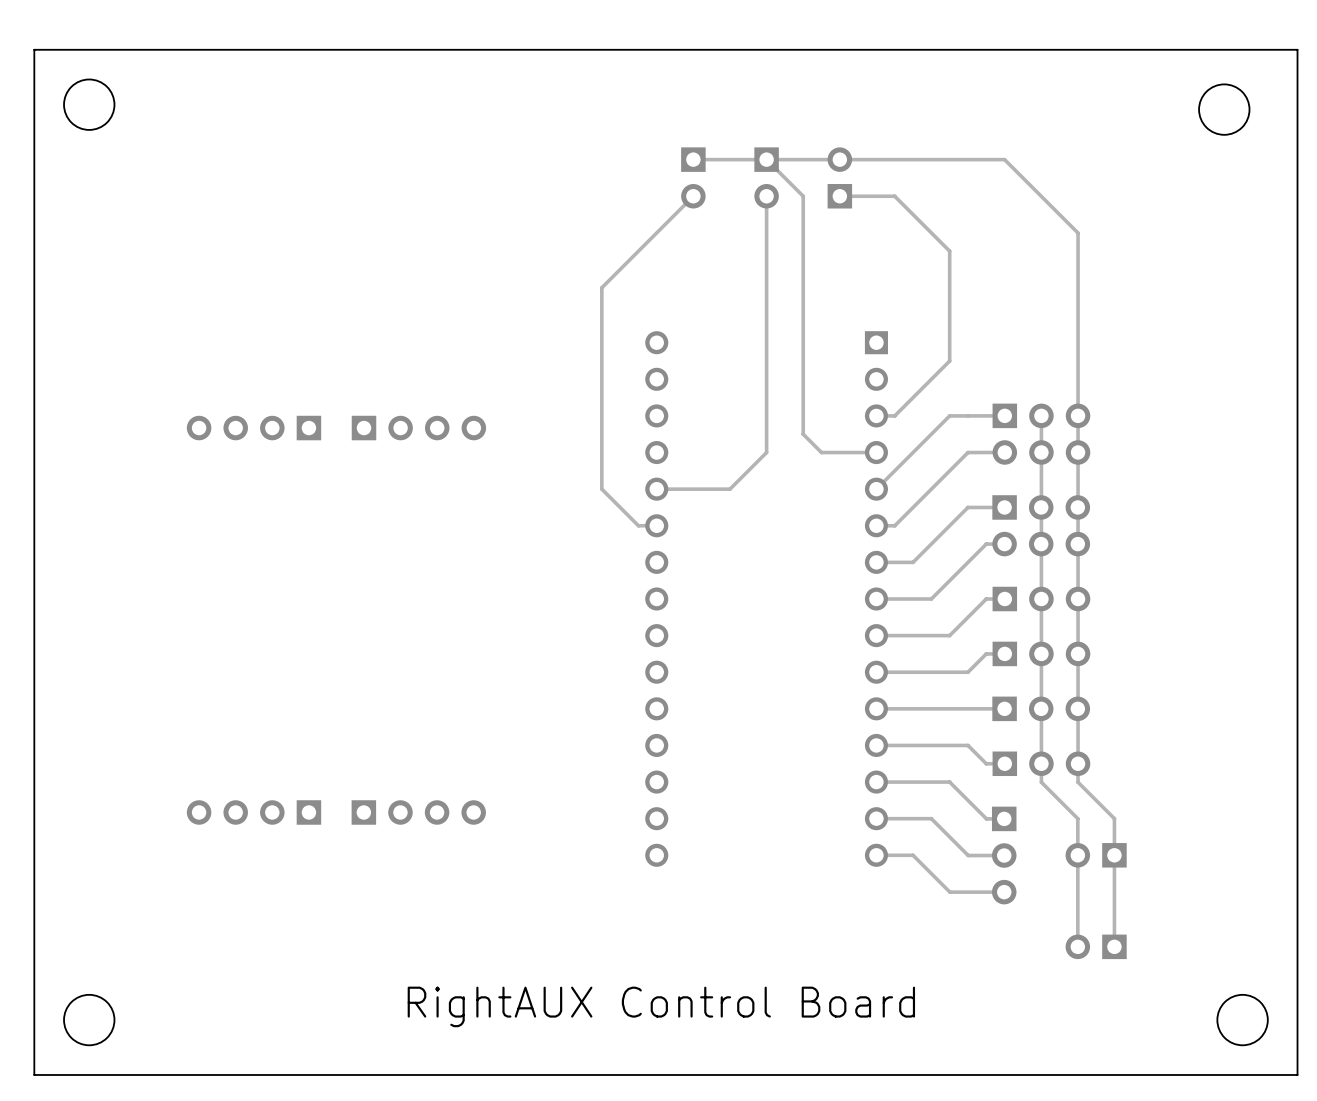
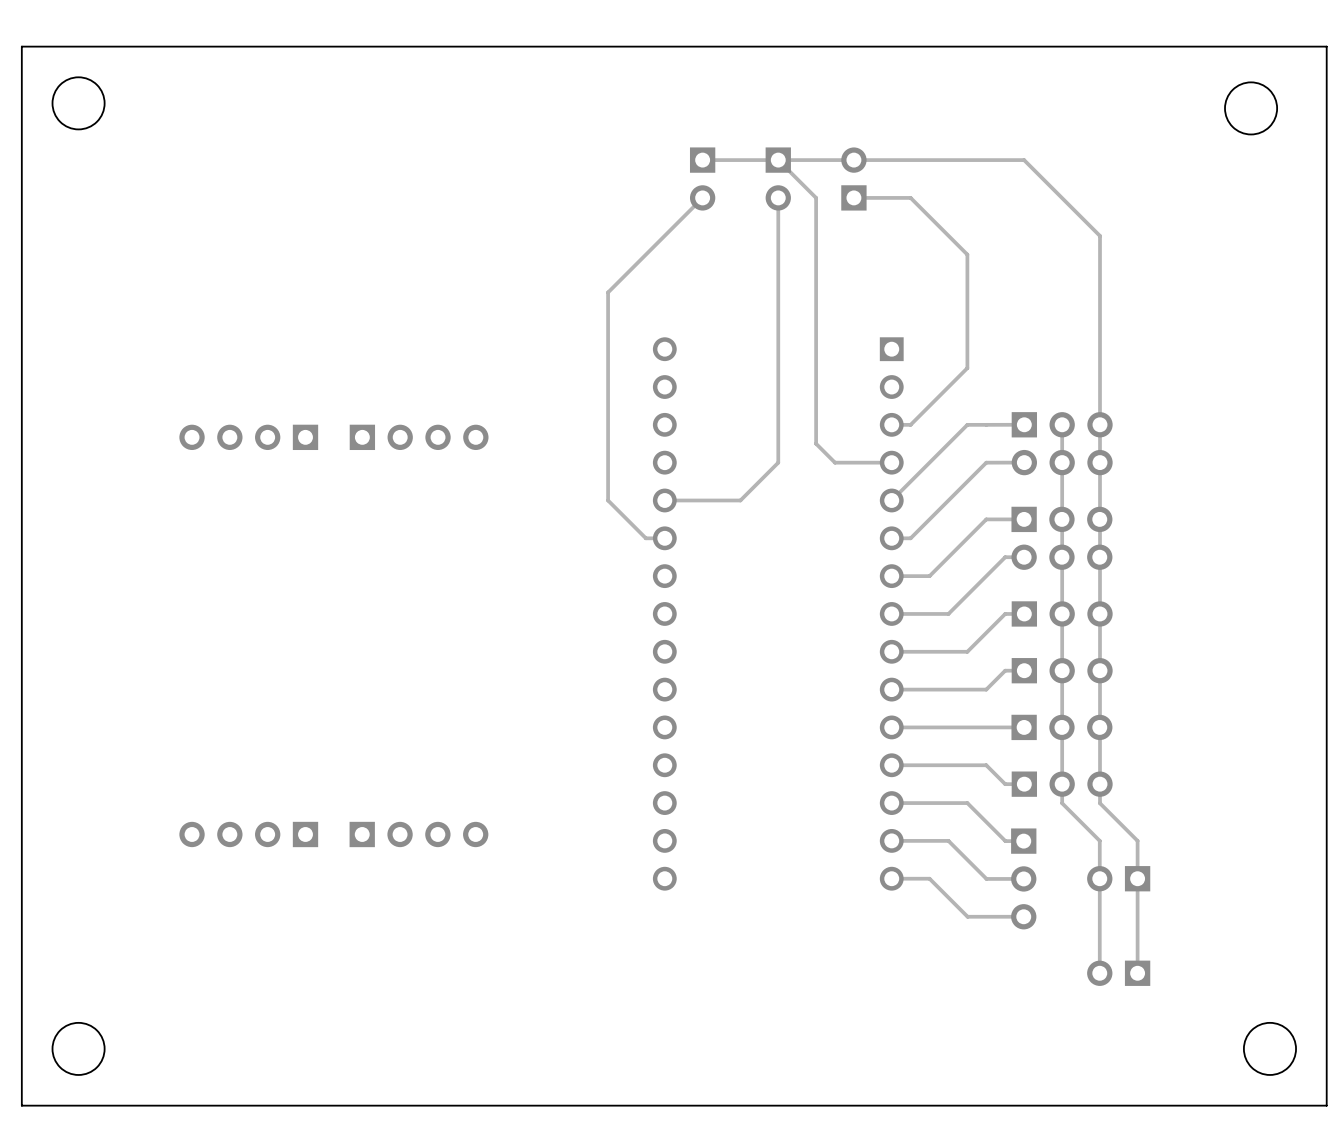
text: RightAUX Control Board (661, 1006) -> none

